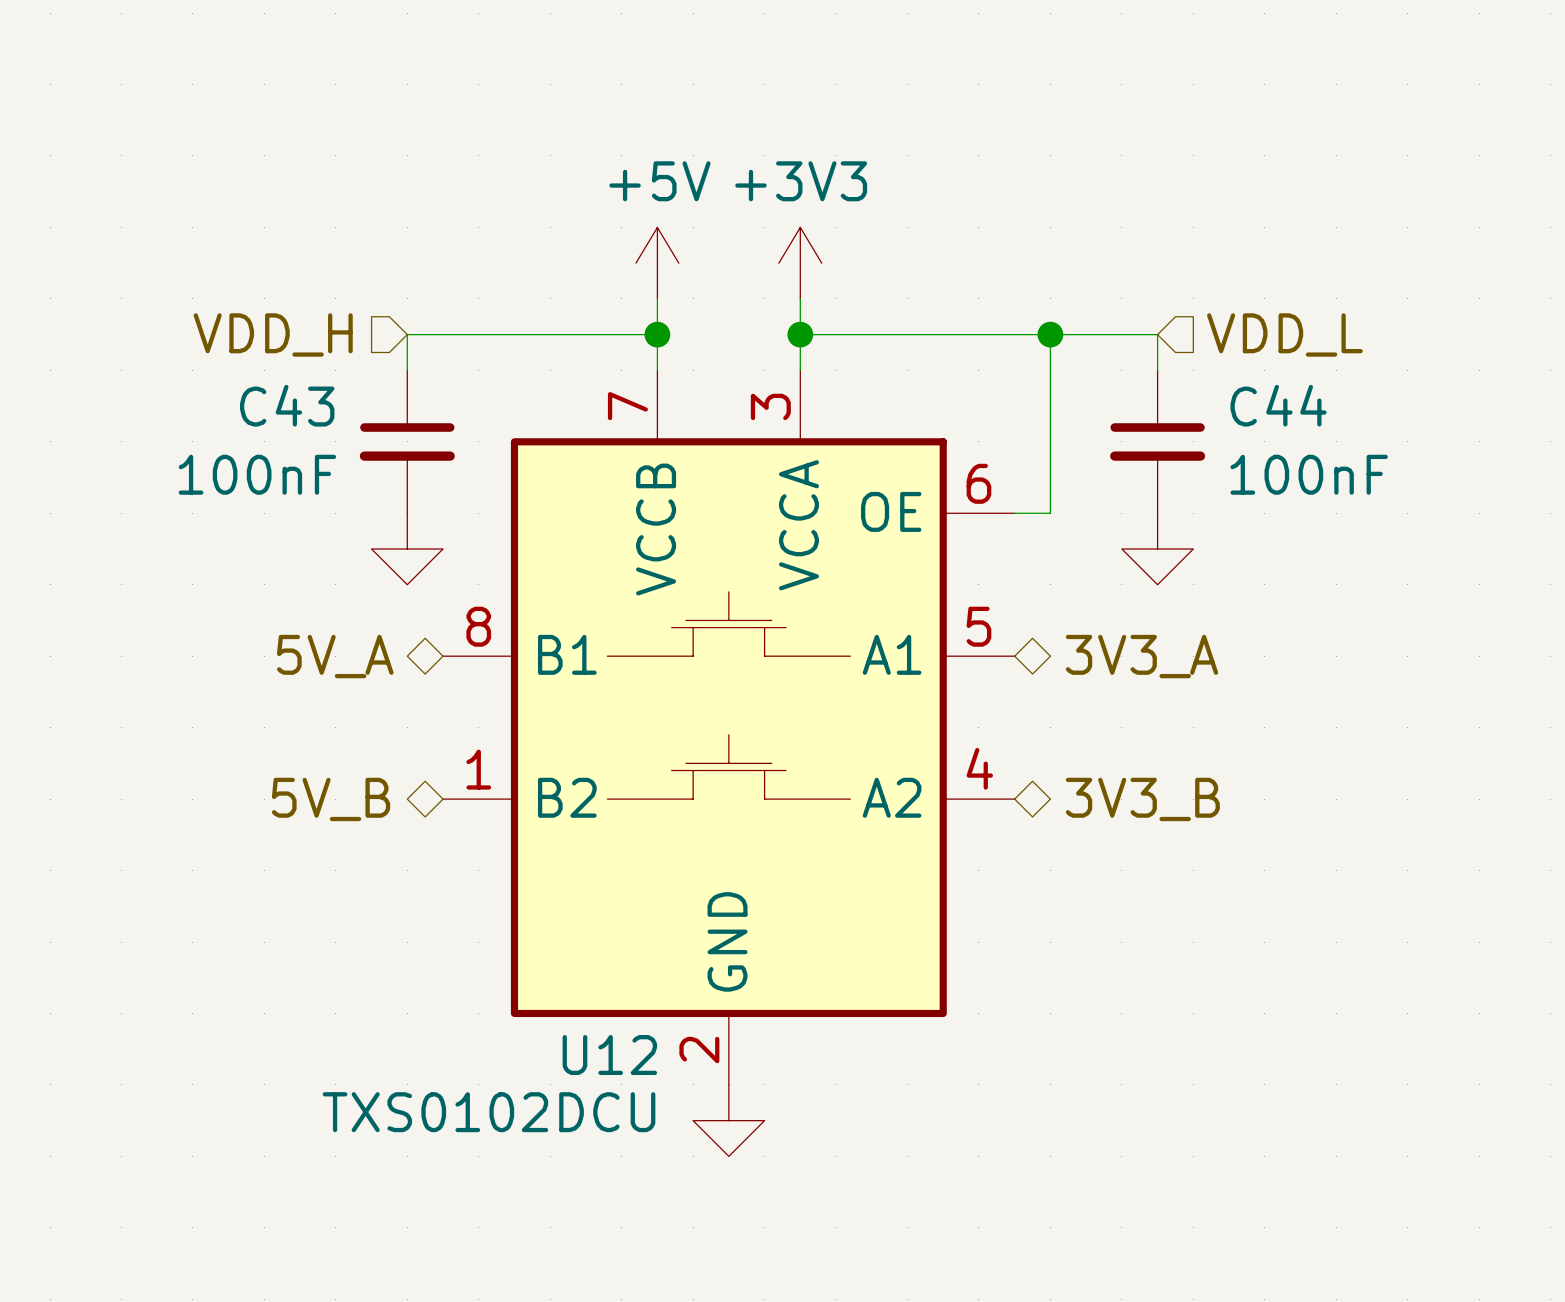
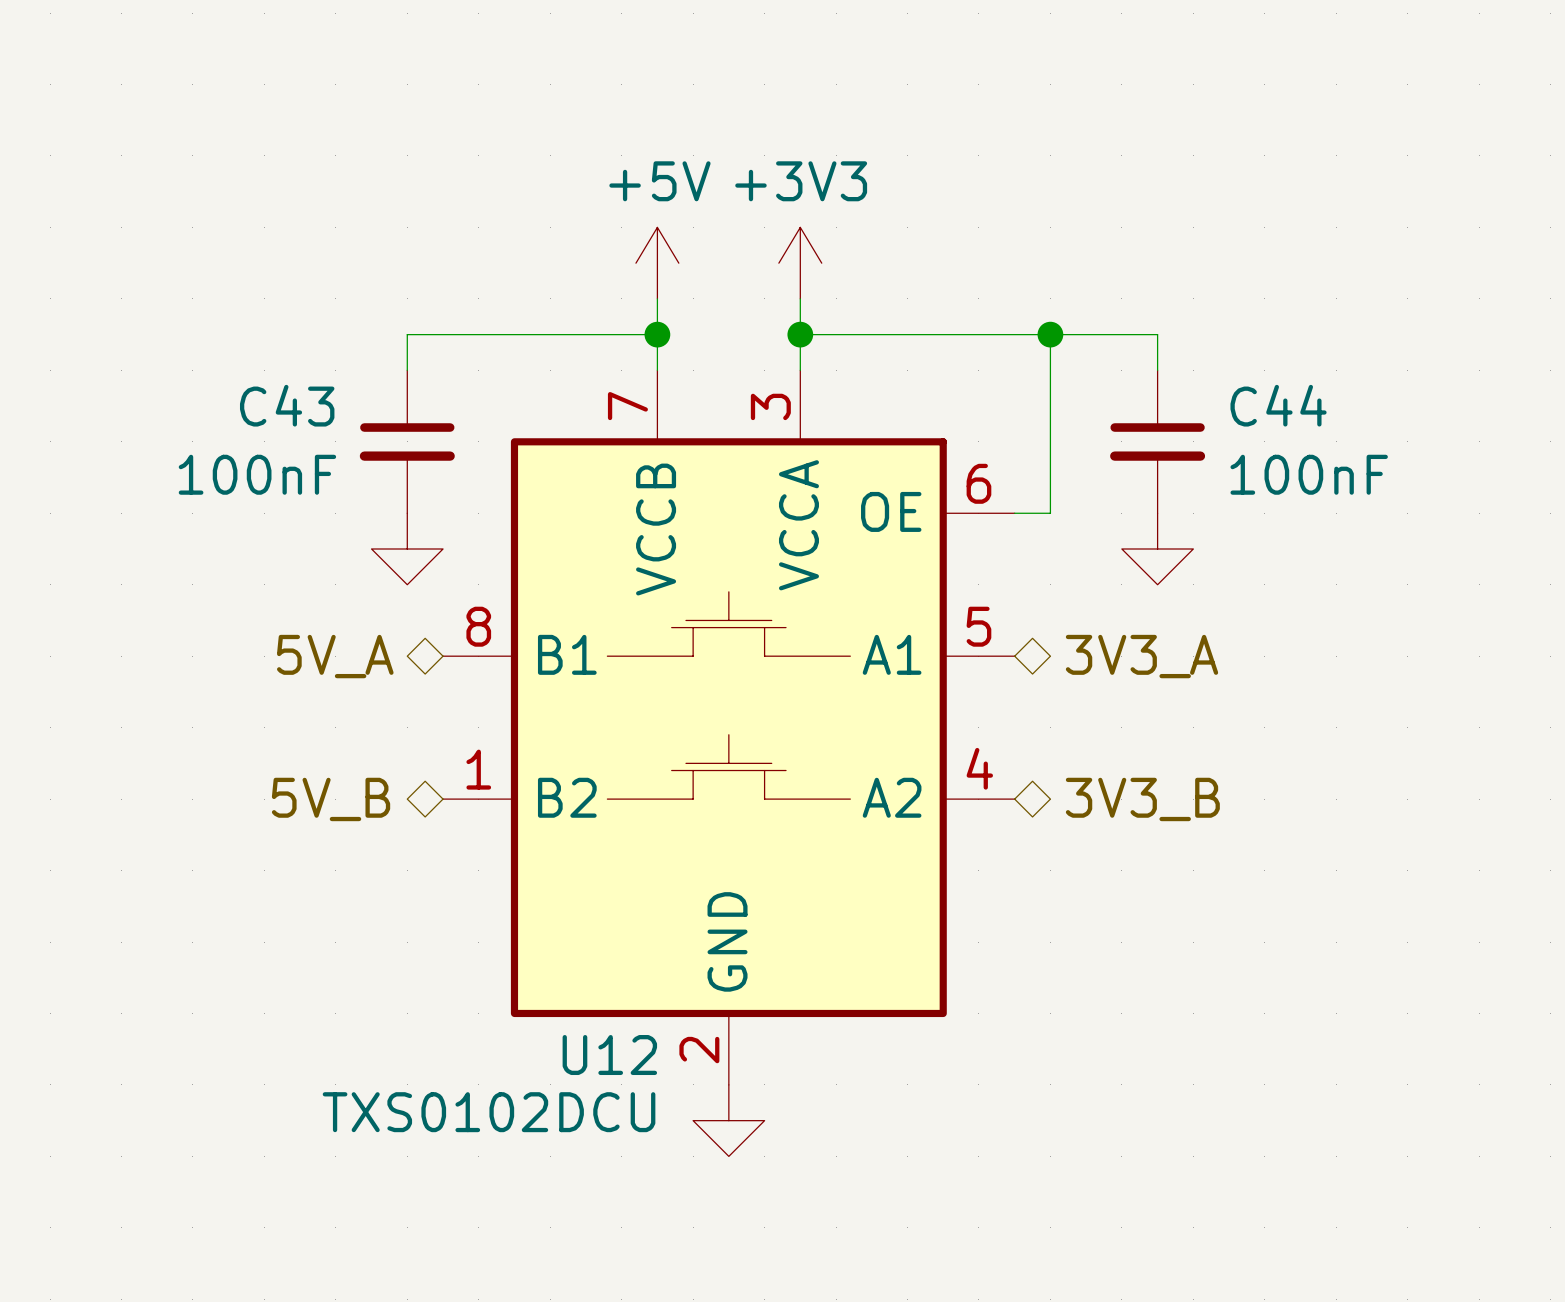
hierarchical label: VDD_H (273, 334) -> none
hierarchical label: VDD_L (1284, 334) -> none

